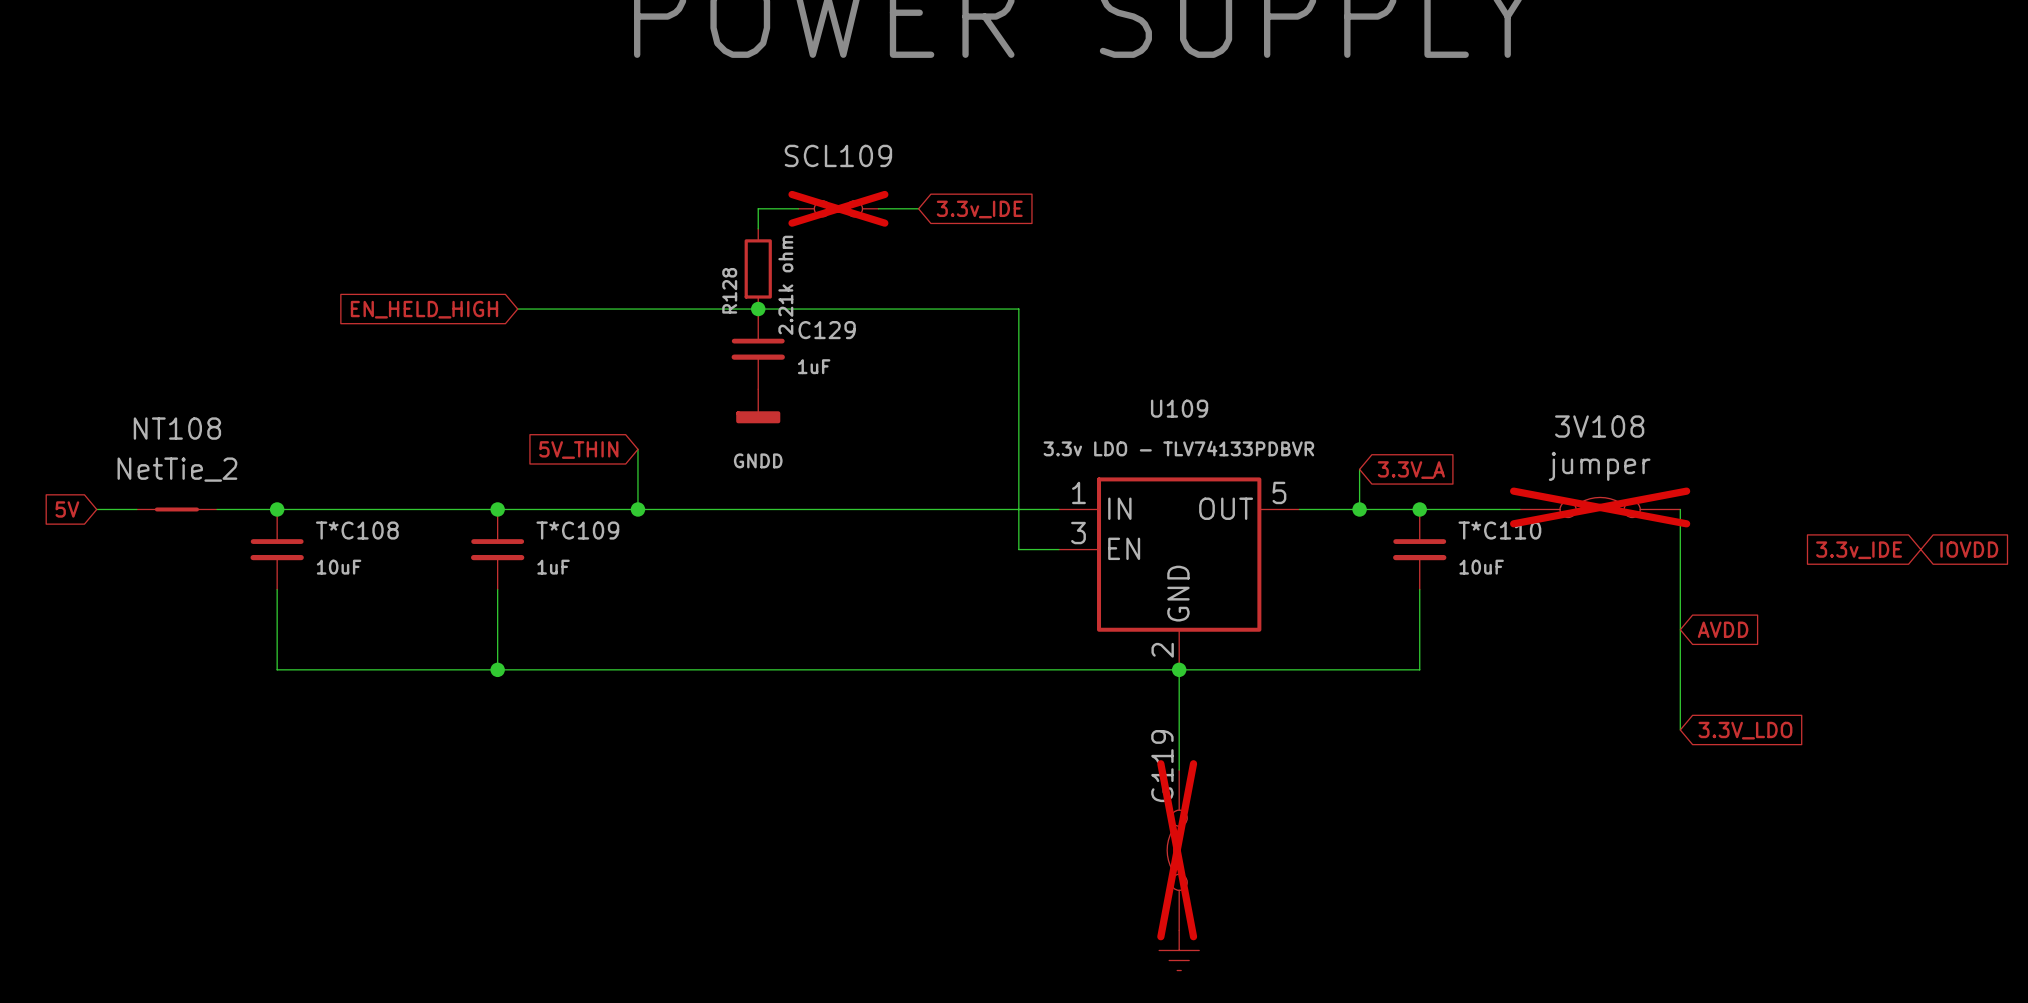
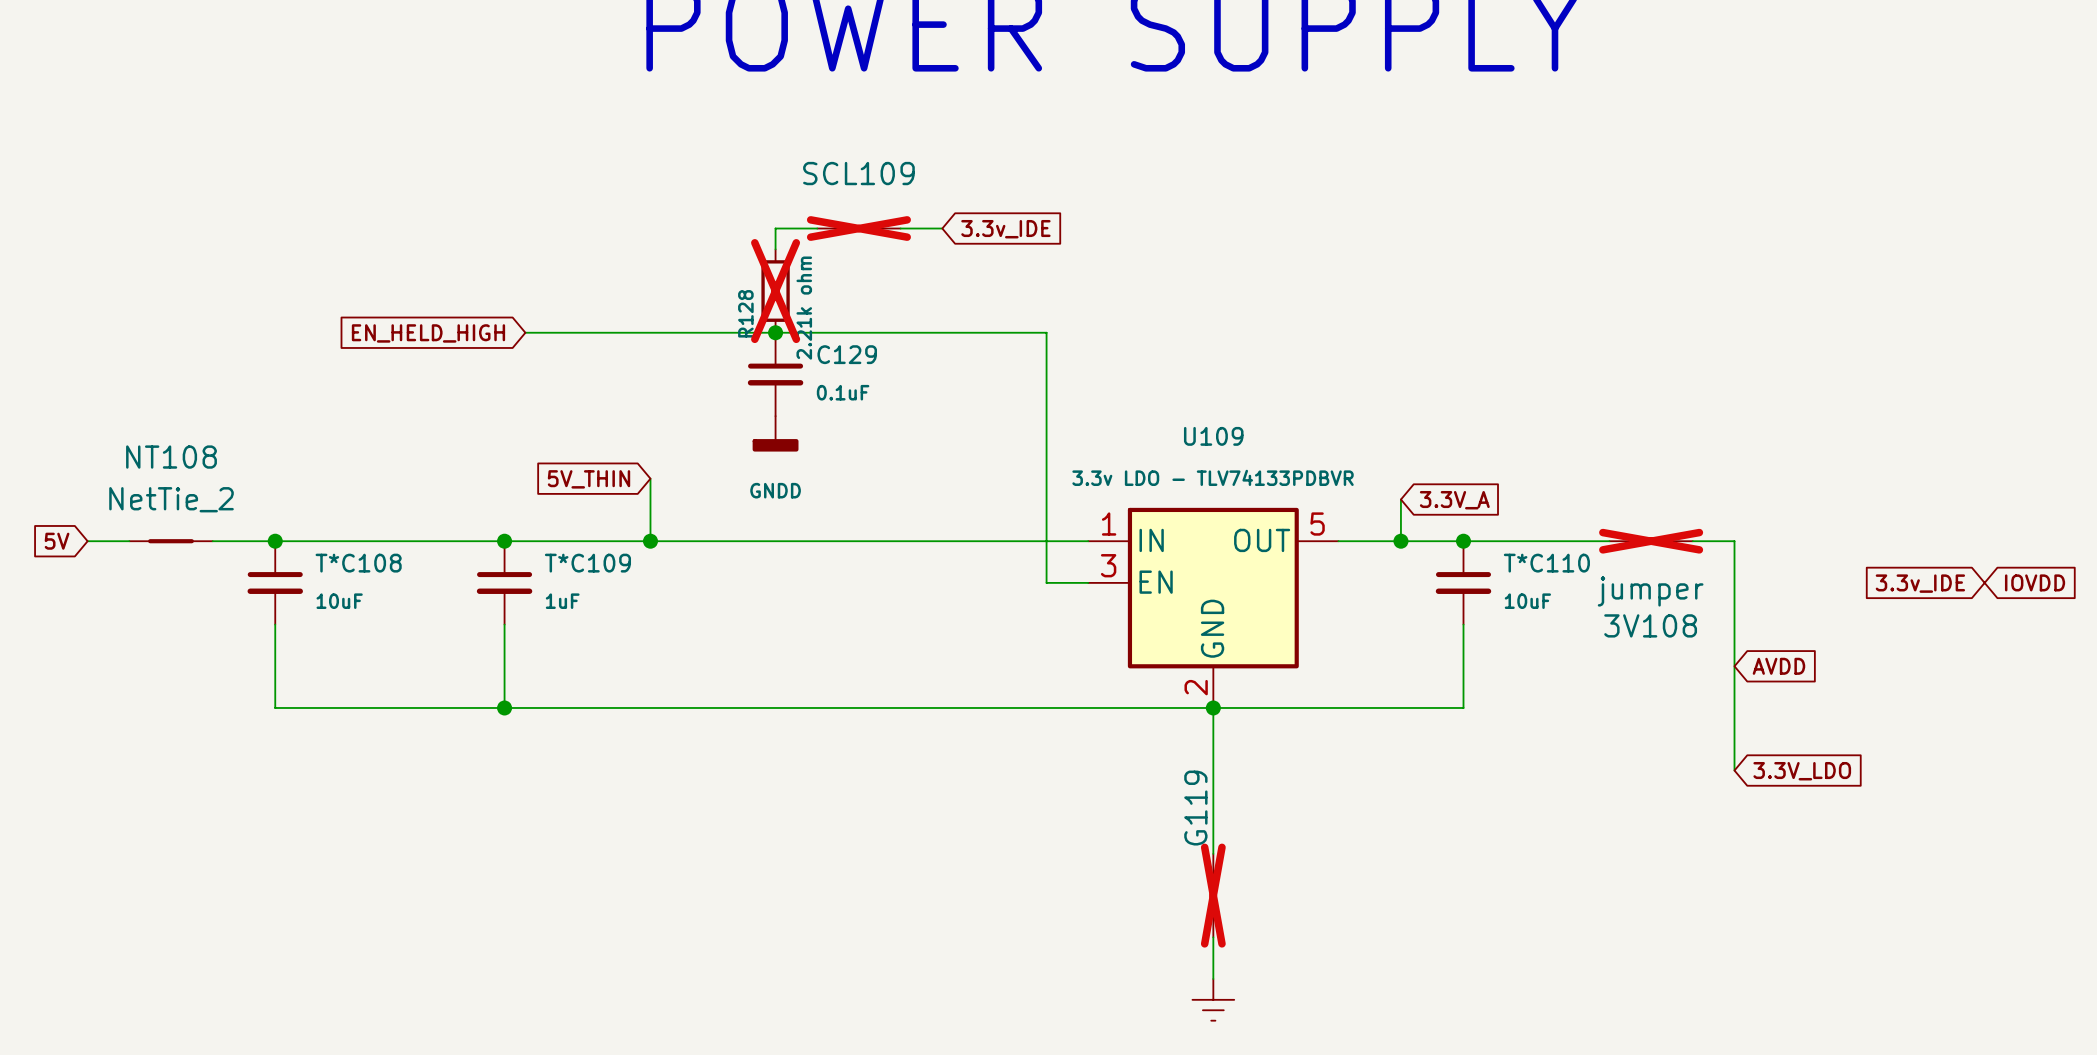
SCL109 symbol: [798, 200, 879, 217] -> [817, 226, 901, 231]
R128 do-not-place cross: none -> (775, 291)
C129 value: 1uF (814, 366) -> 0.1uF (843, 392)
3V108 name position: 3V108 (1599, 426) -> 3V108 (1650, 625)
3V108 value position: jumper (1599, 466) -> jumper (1650, 591)
3V108 symbol: [1519, 497, 1681, 518] -> [1609, 539, 1693, 544]
G119 symbol: [1167, 770, 1188, 931] -> [1211, 853, 1216, 938]

